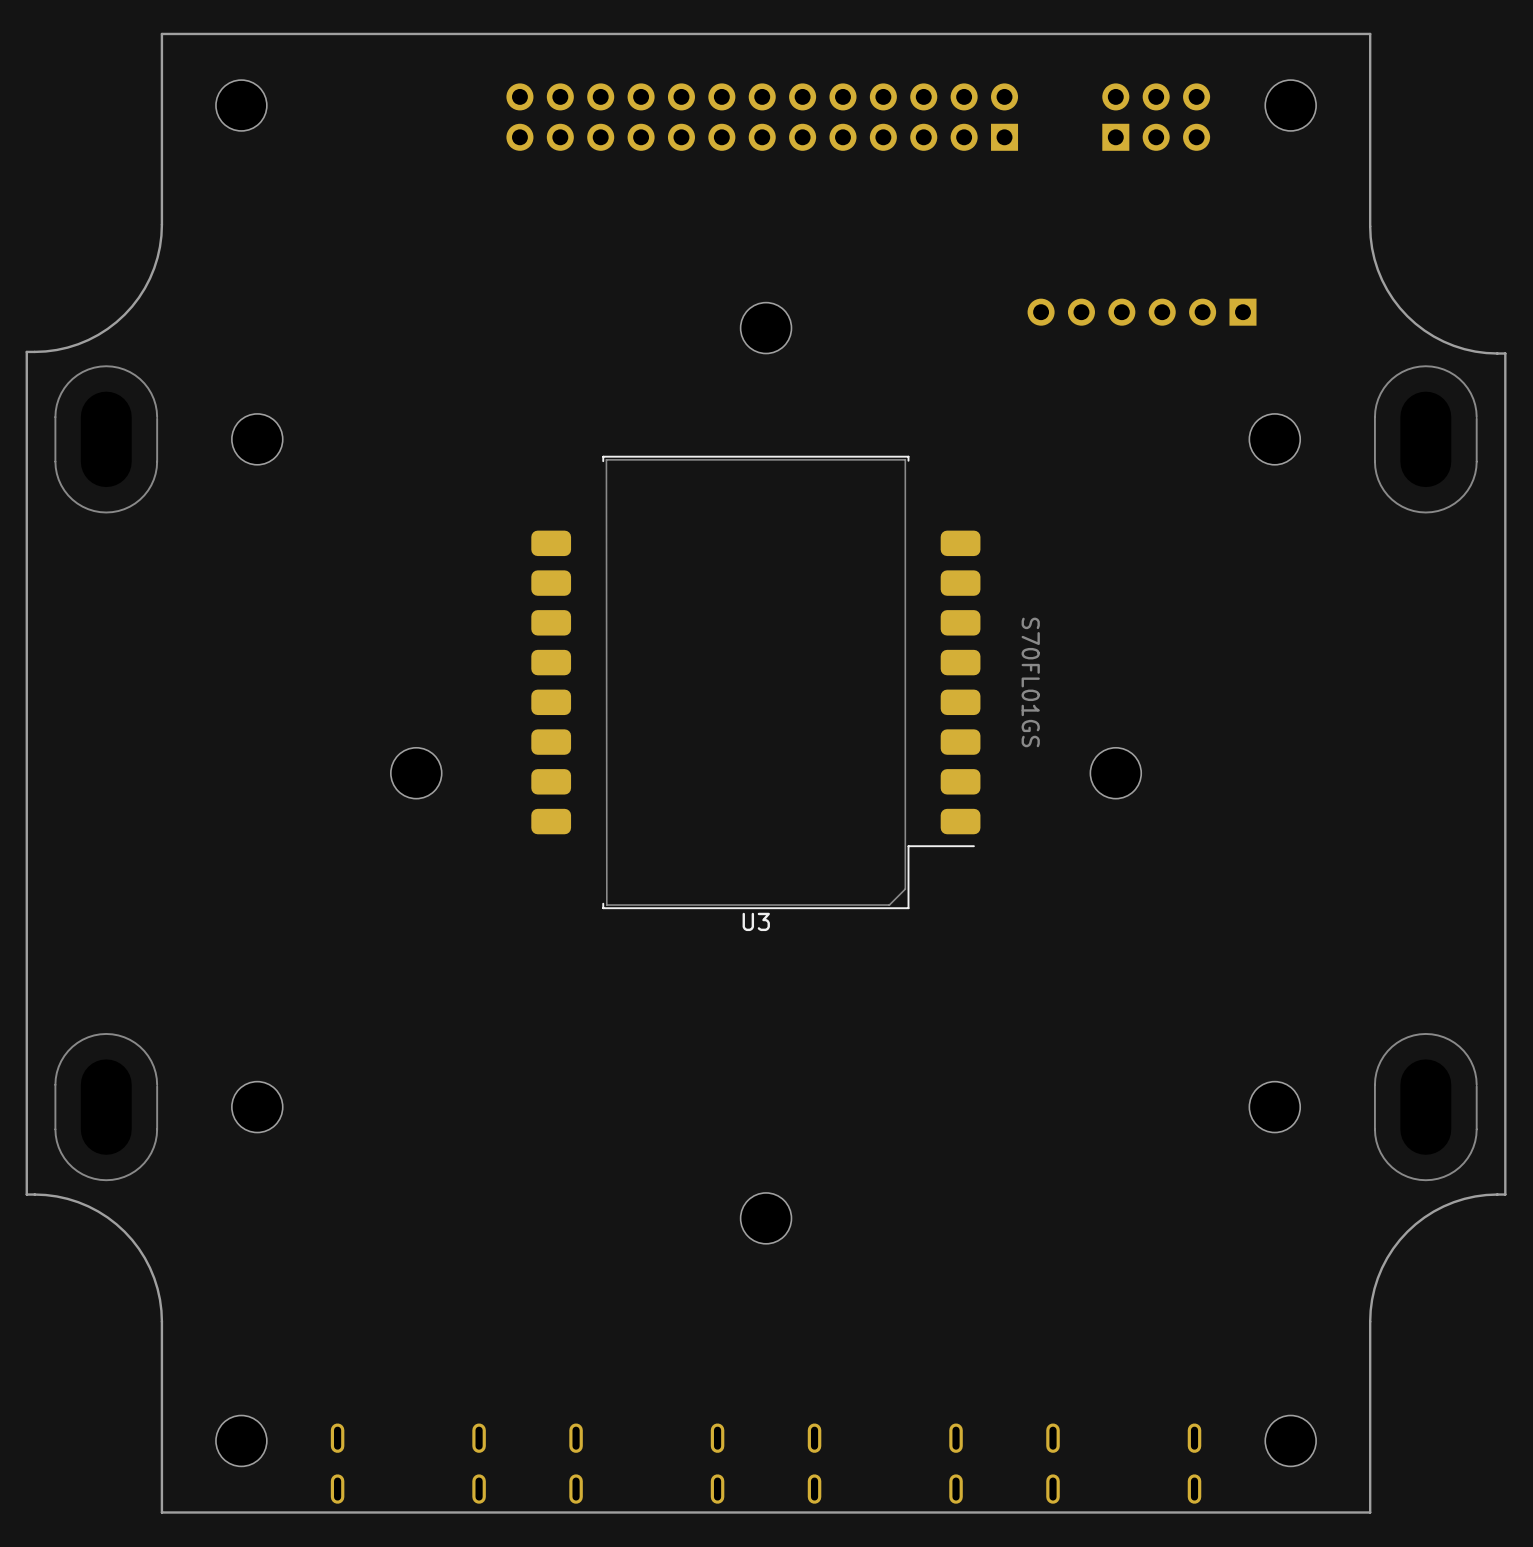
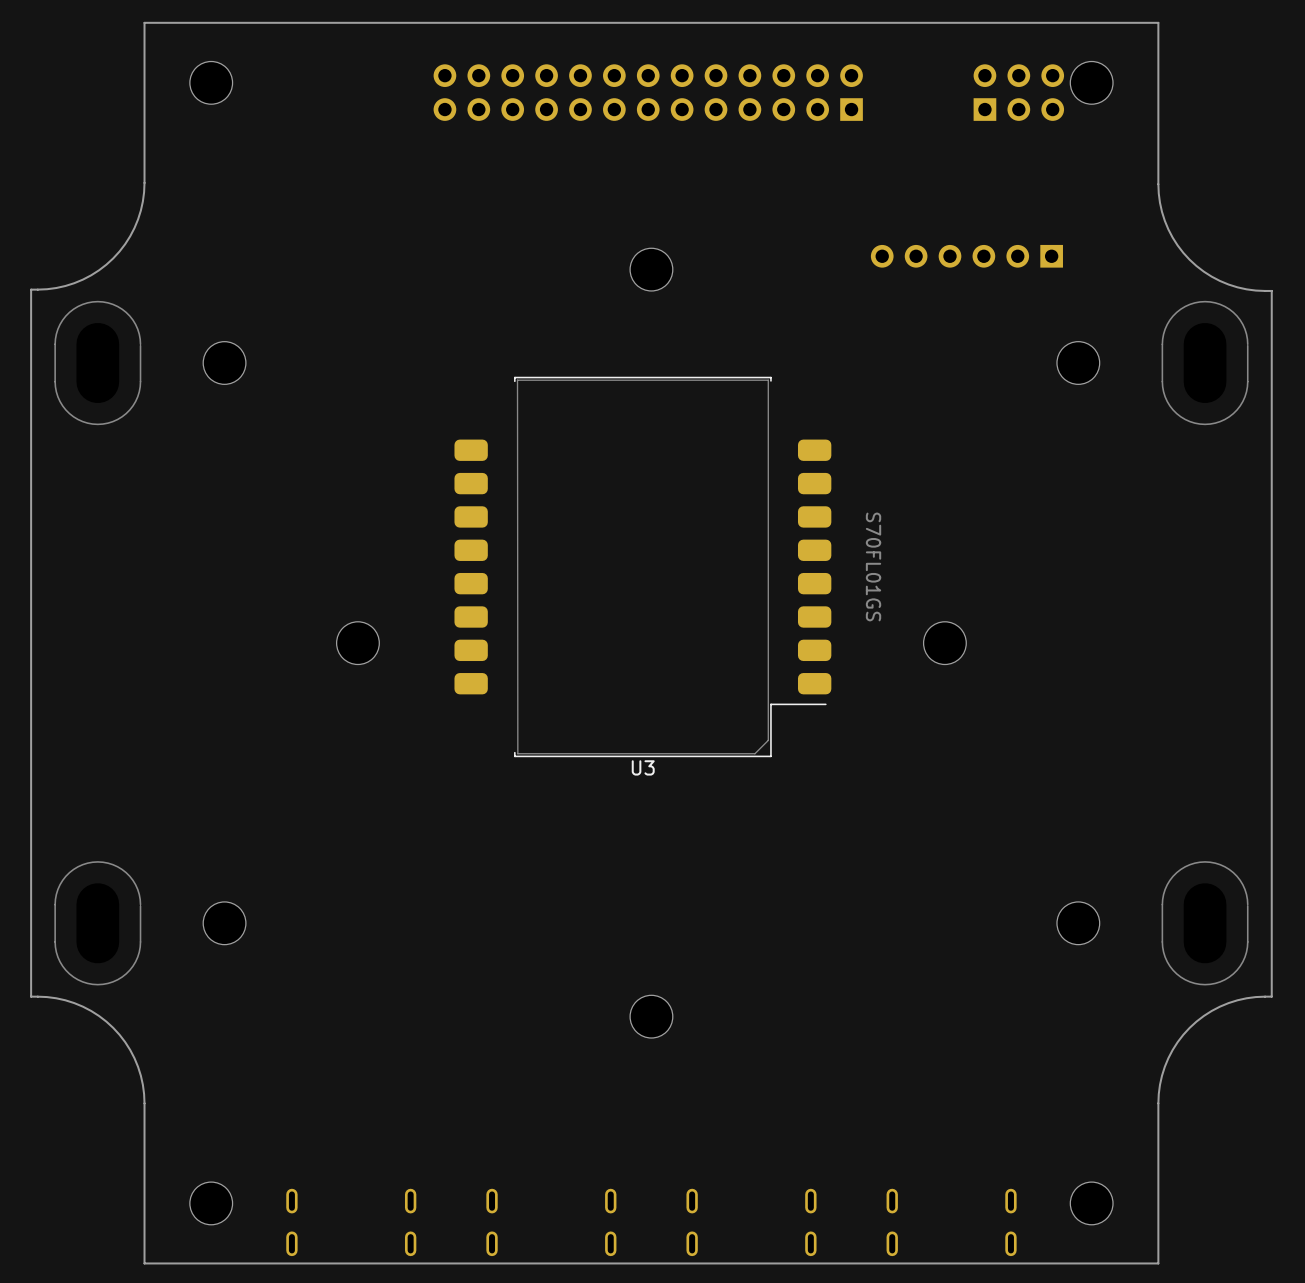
part position: (1156, 117) -> (1018, 92)

